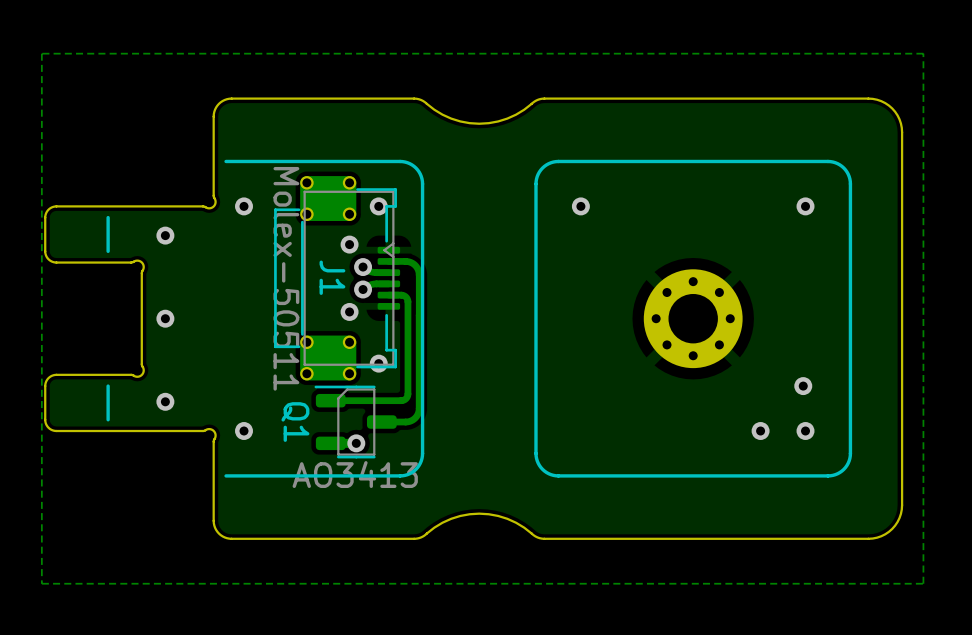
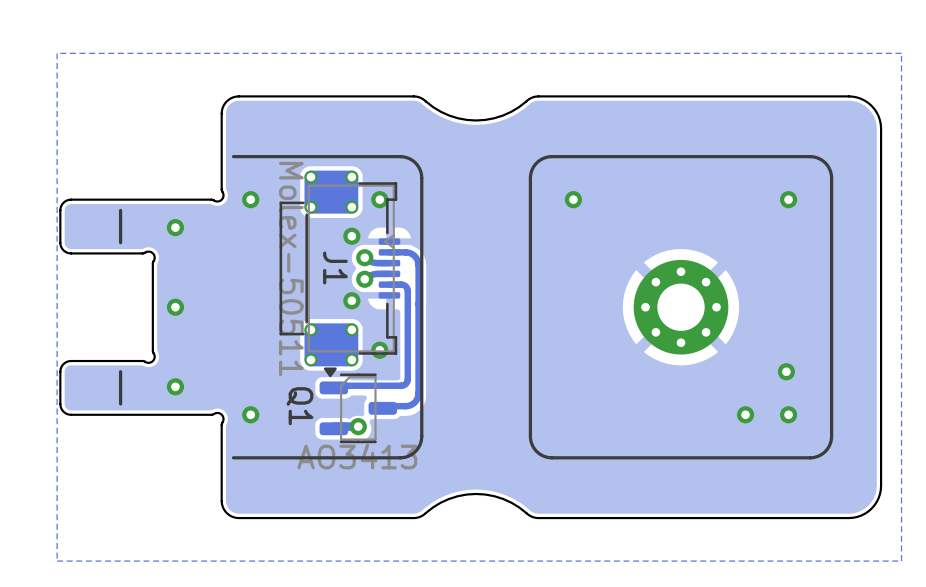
Q1 footprint: [314, 385, 397, 459] -> [319, 367, 398, 444]

